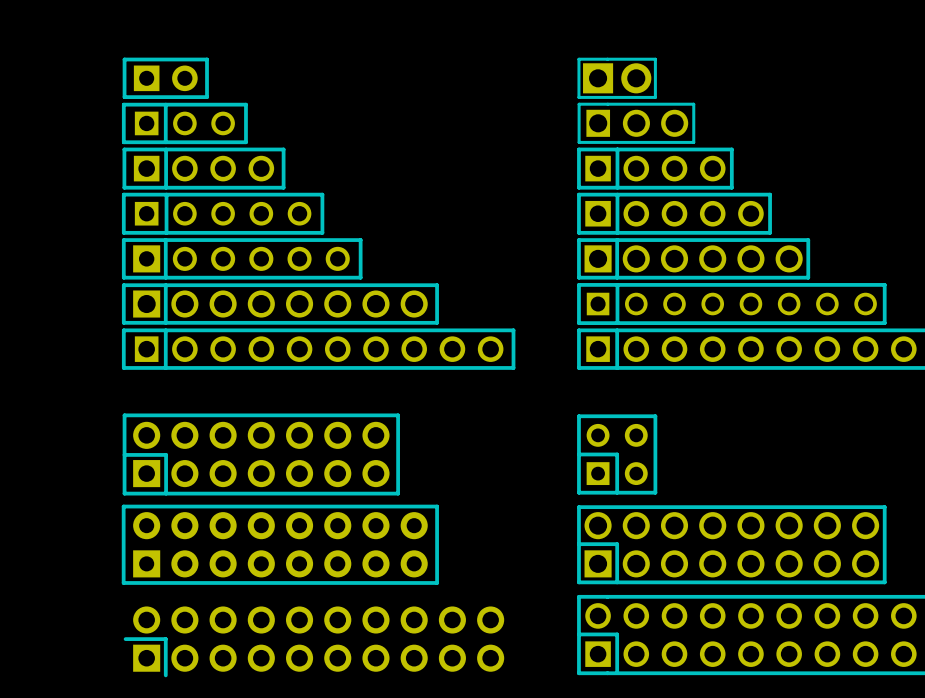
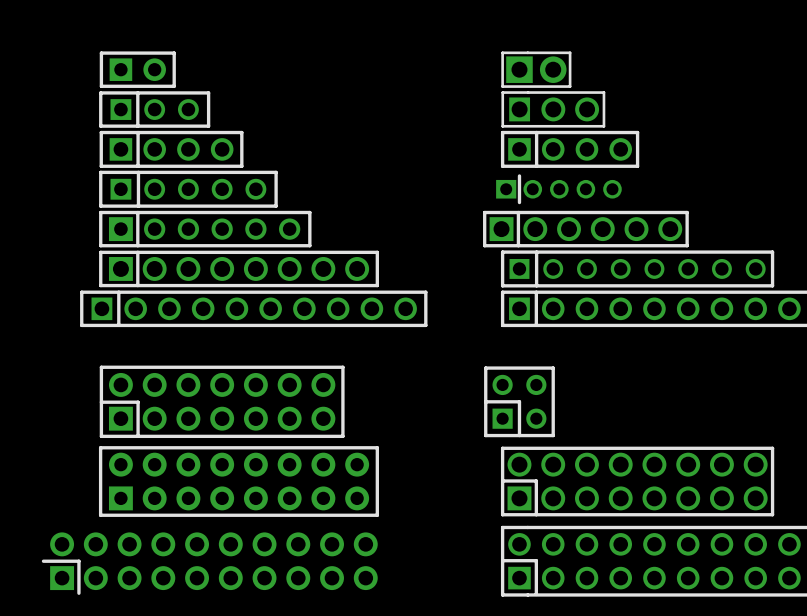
part: none -> (558, 189)
part: (674, 213) -> none
part position: (693, 258) -> (585, 229)
part position: (318, 349) -> (253, 308)
part position: (617, 454) -> (519, 401)
part position: (313, 641) -> (209, 563)

